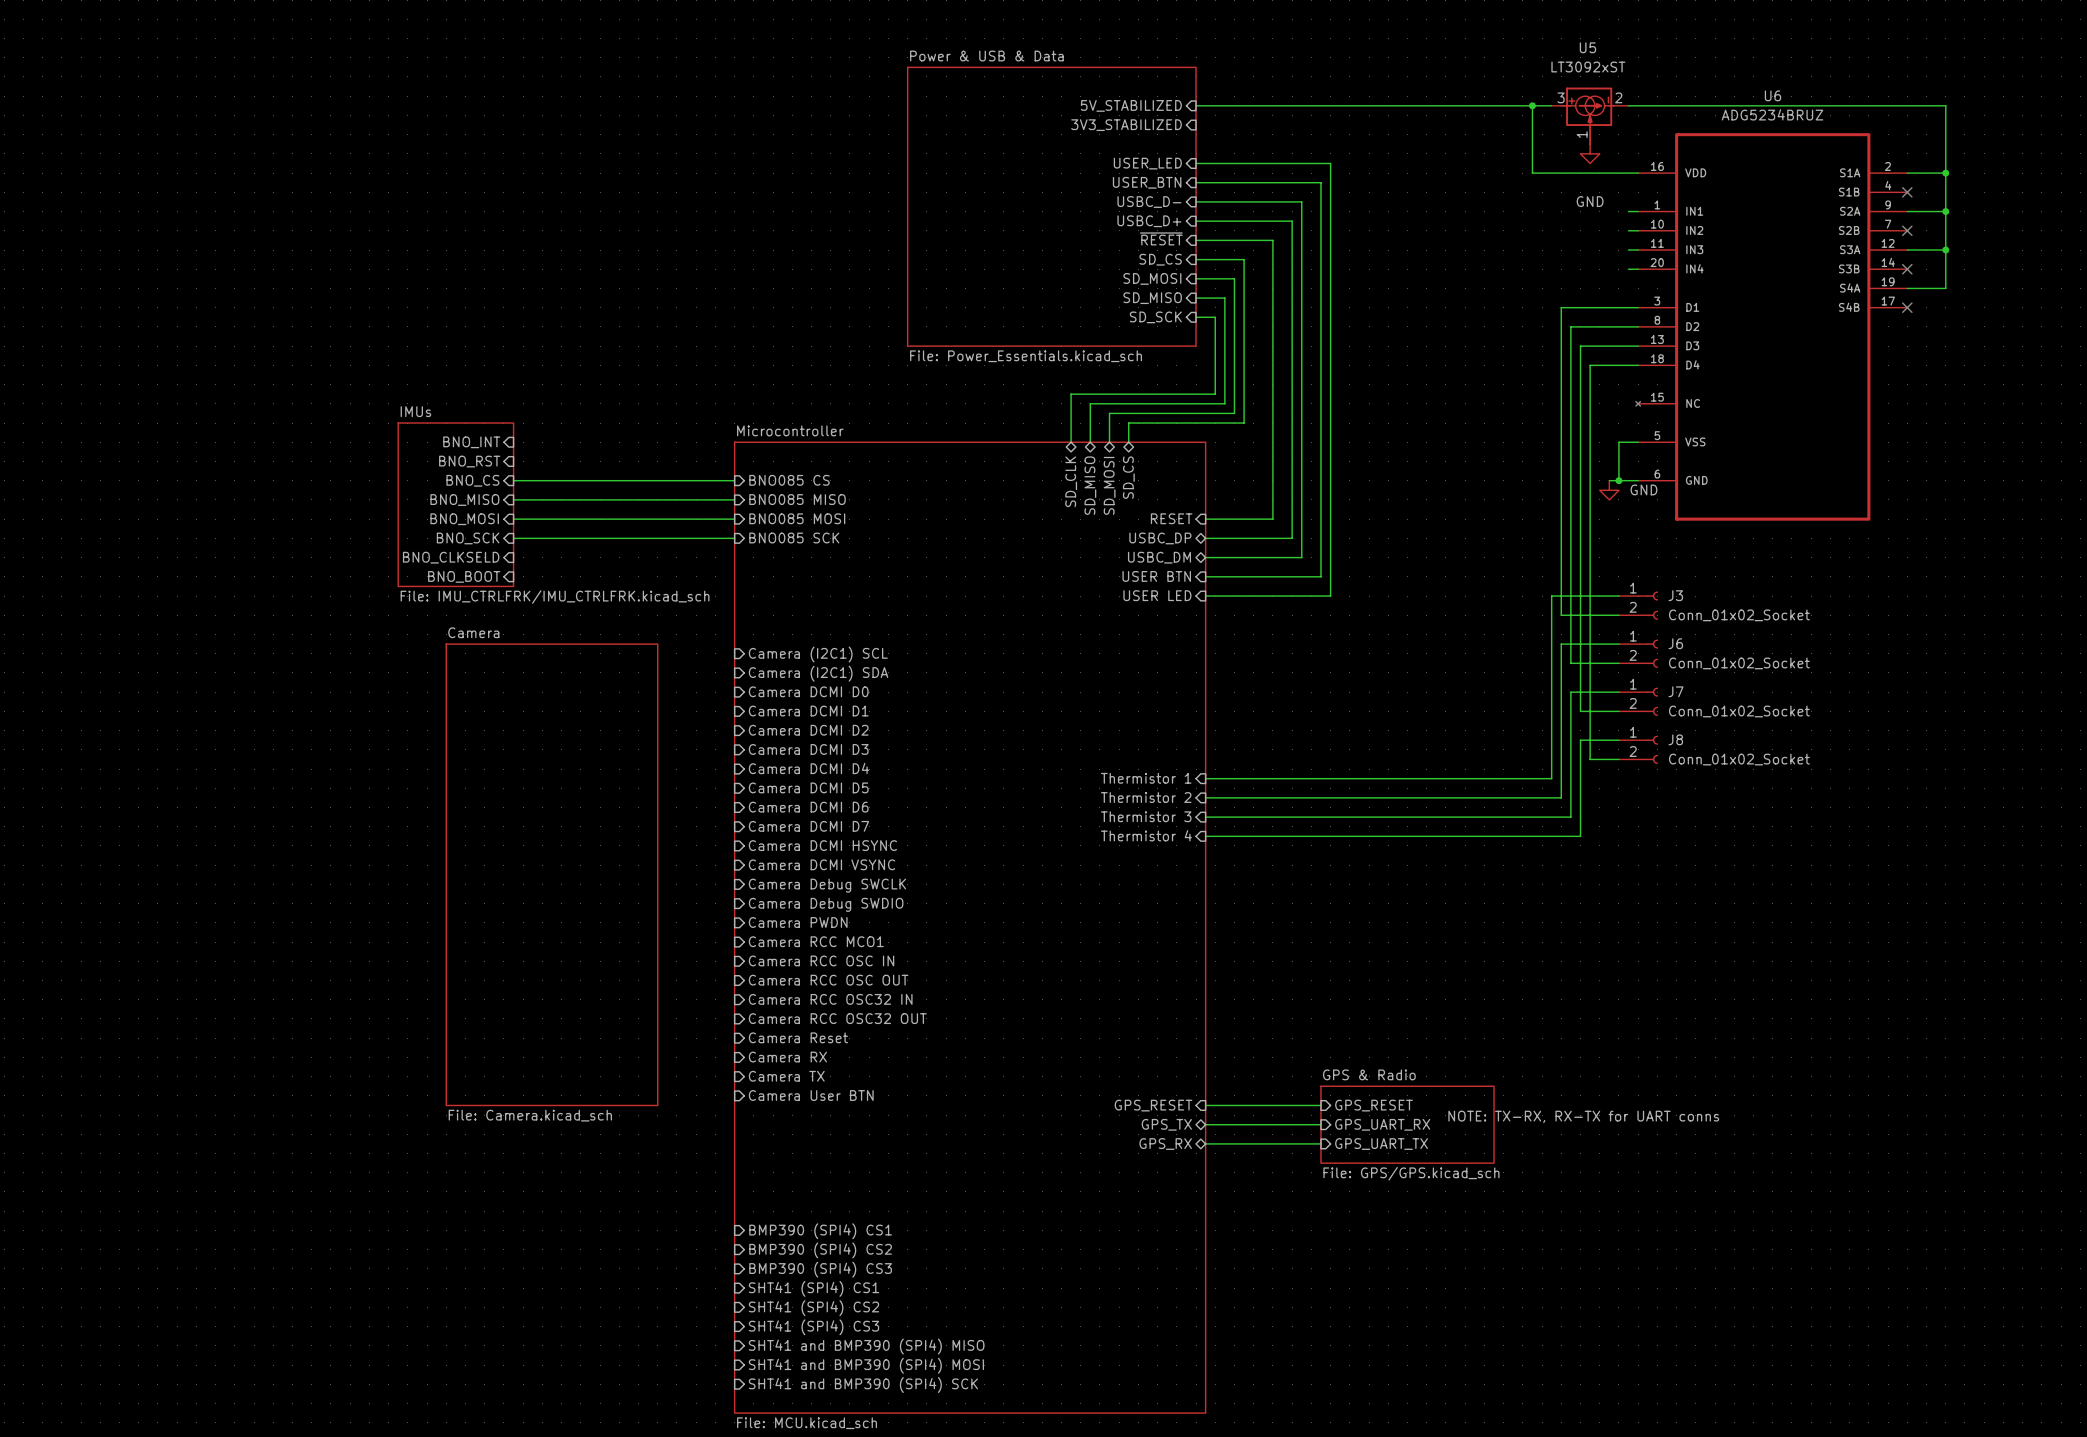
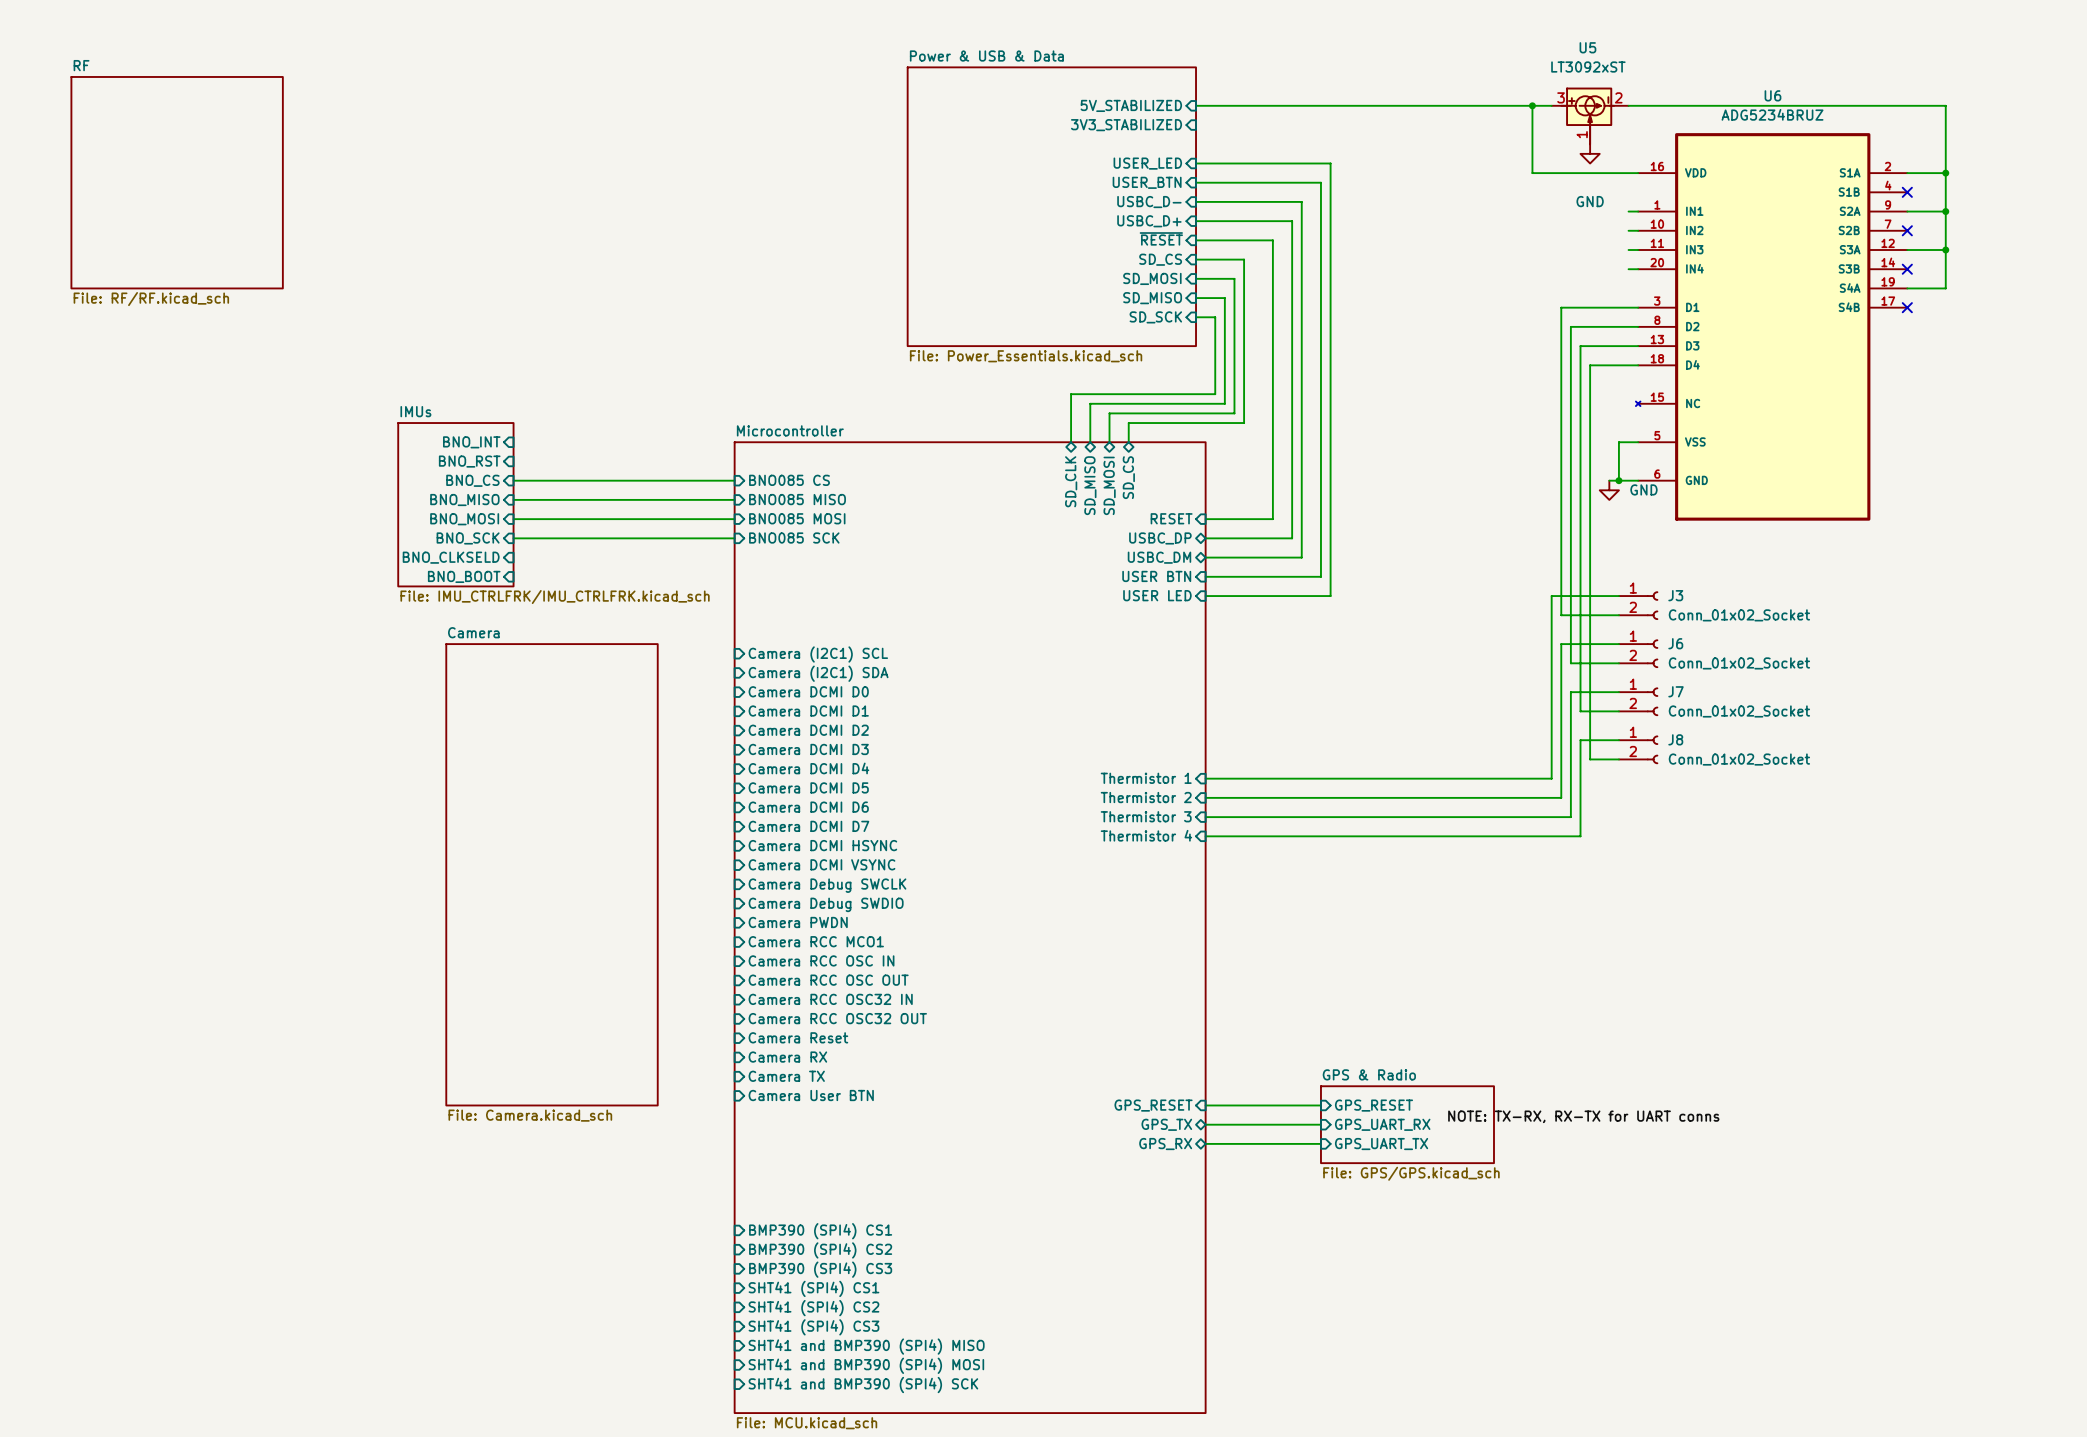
sheet RF: none -> File: RF/RF.kicad_sch (177, 182)

